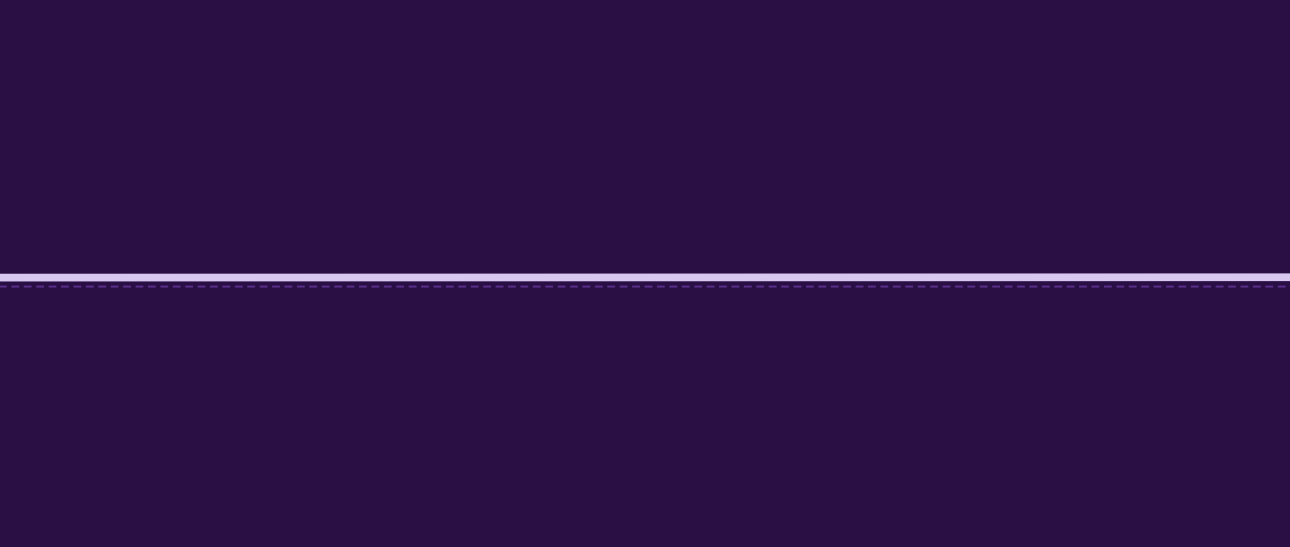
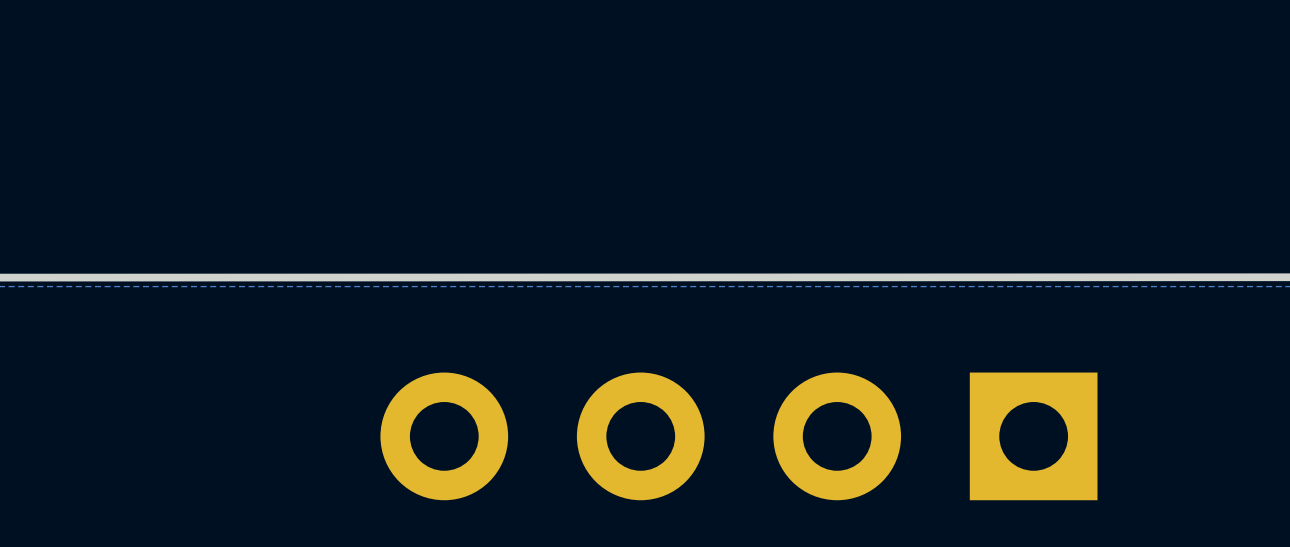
part: none -> (738, 436)

